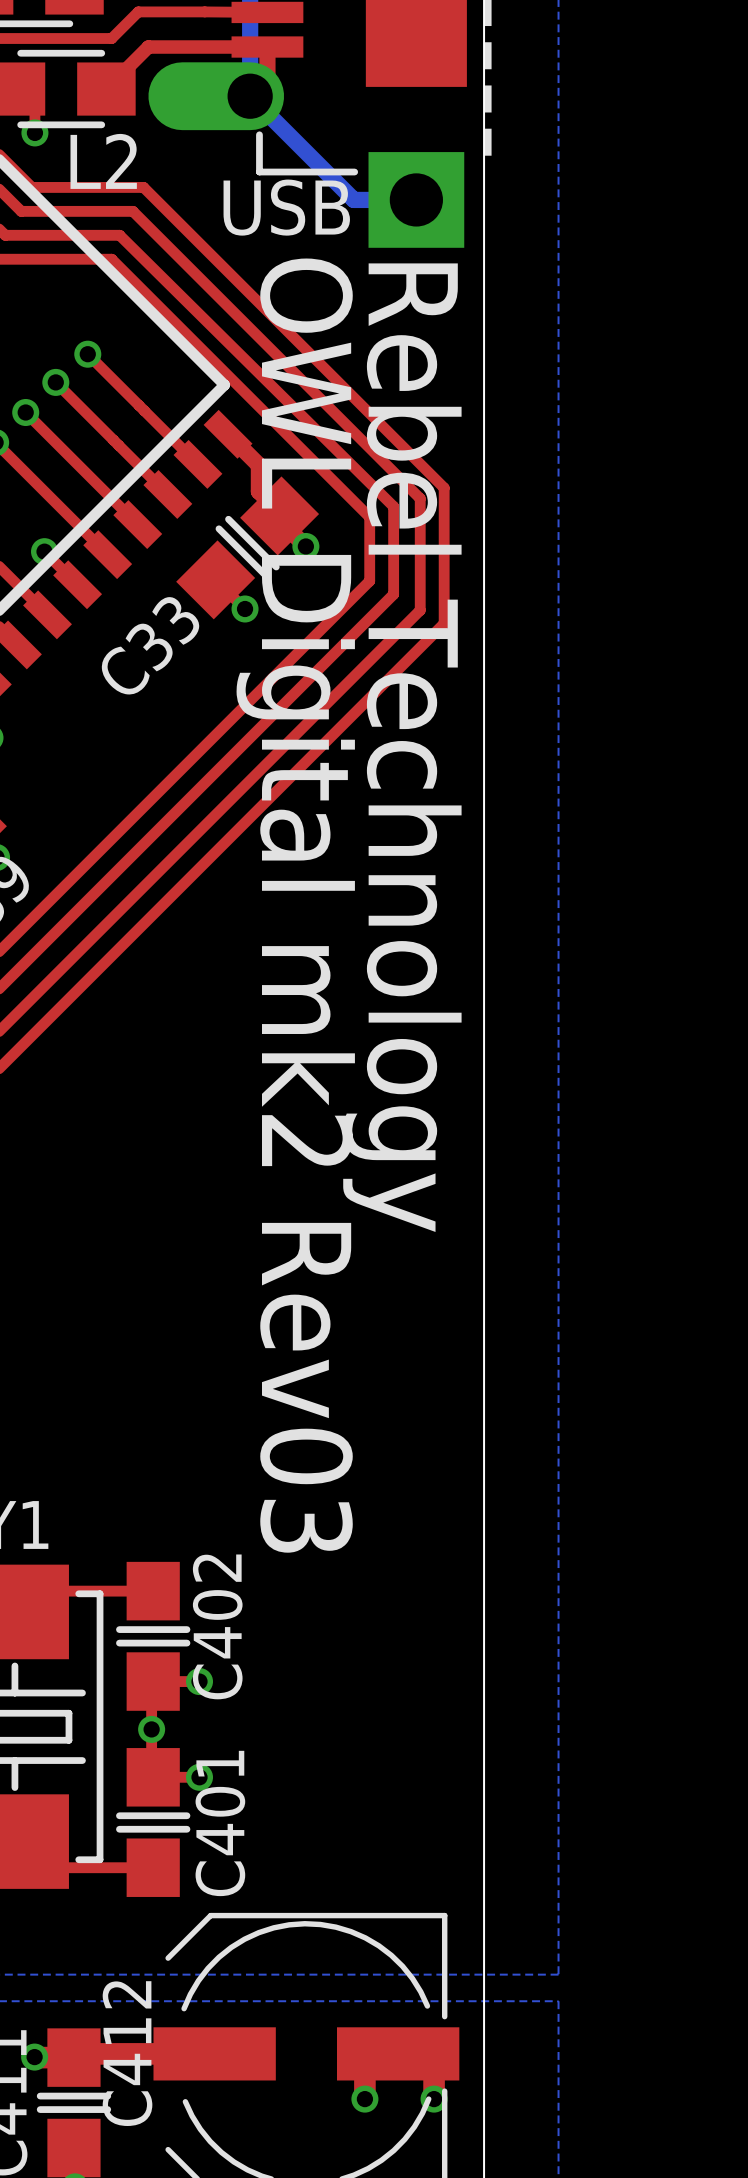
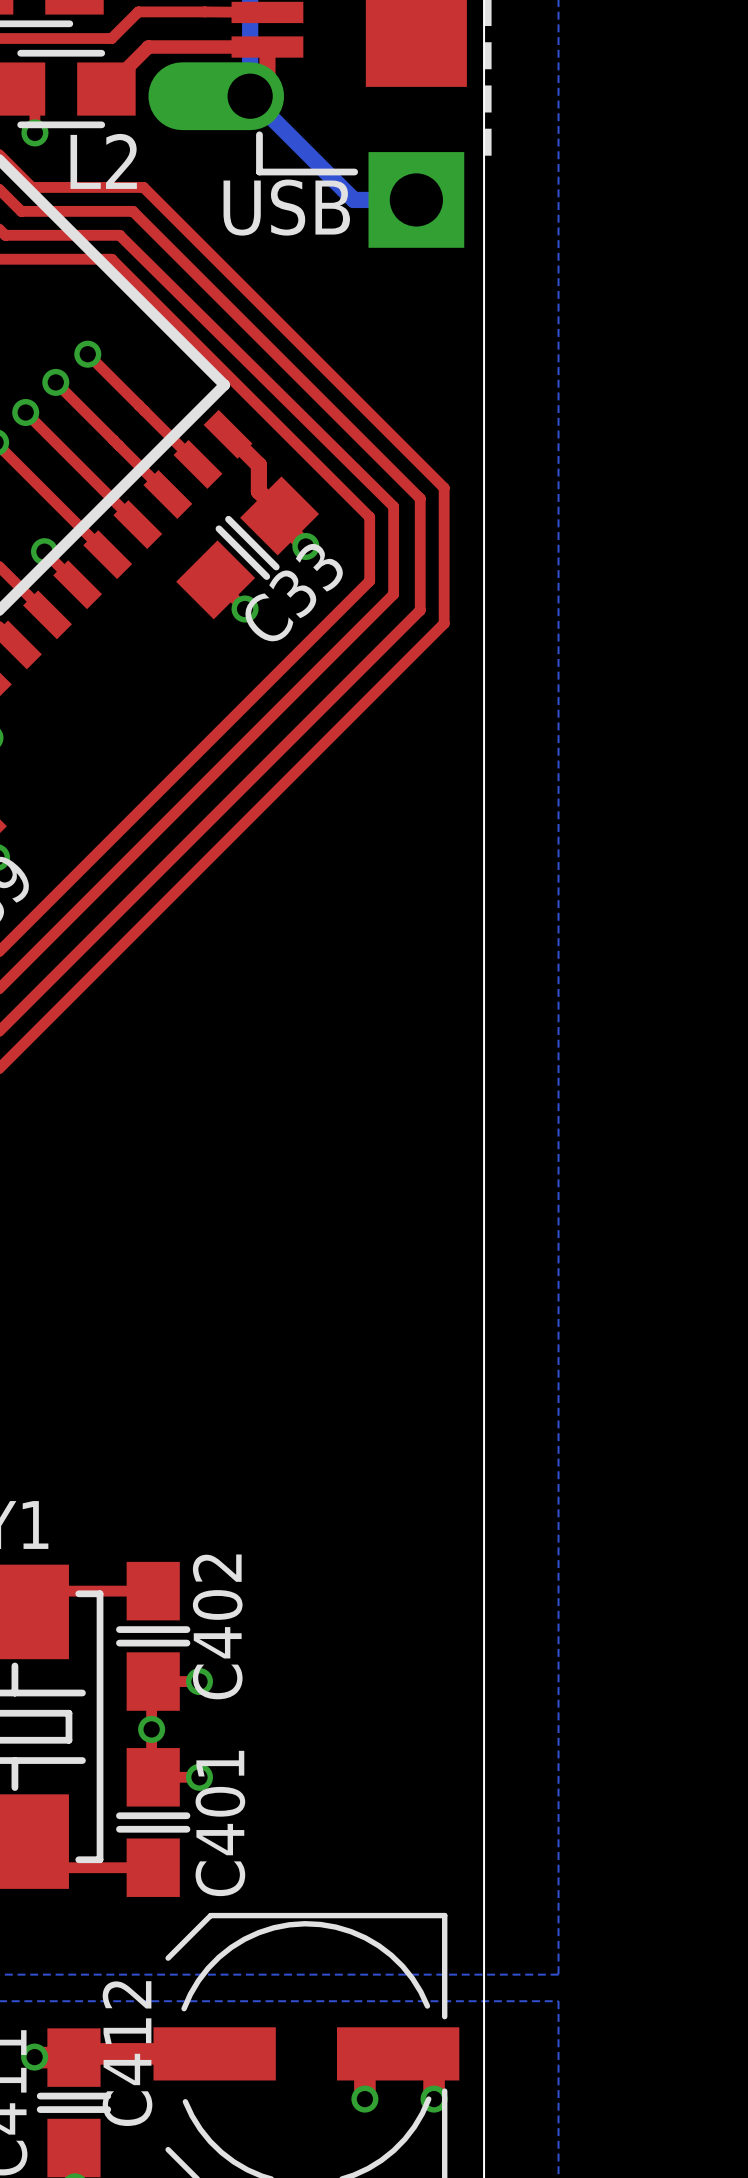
C33 name position: C33 (150, 645) -> C33 (293, 592)
text: Rebel Technology (402, 747) -> none
text: OWL Digital mk2 Rev03 (295, 905) -> none

